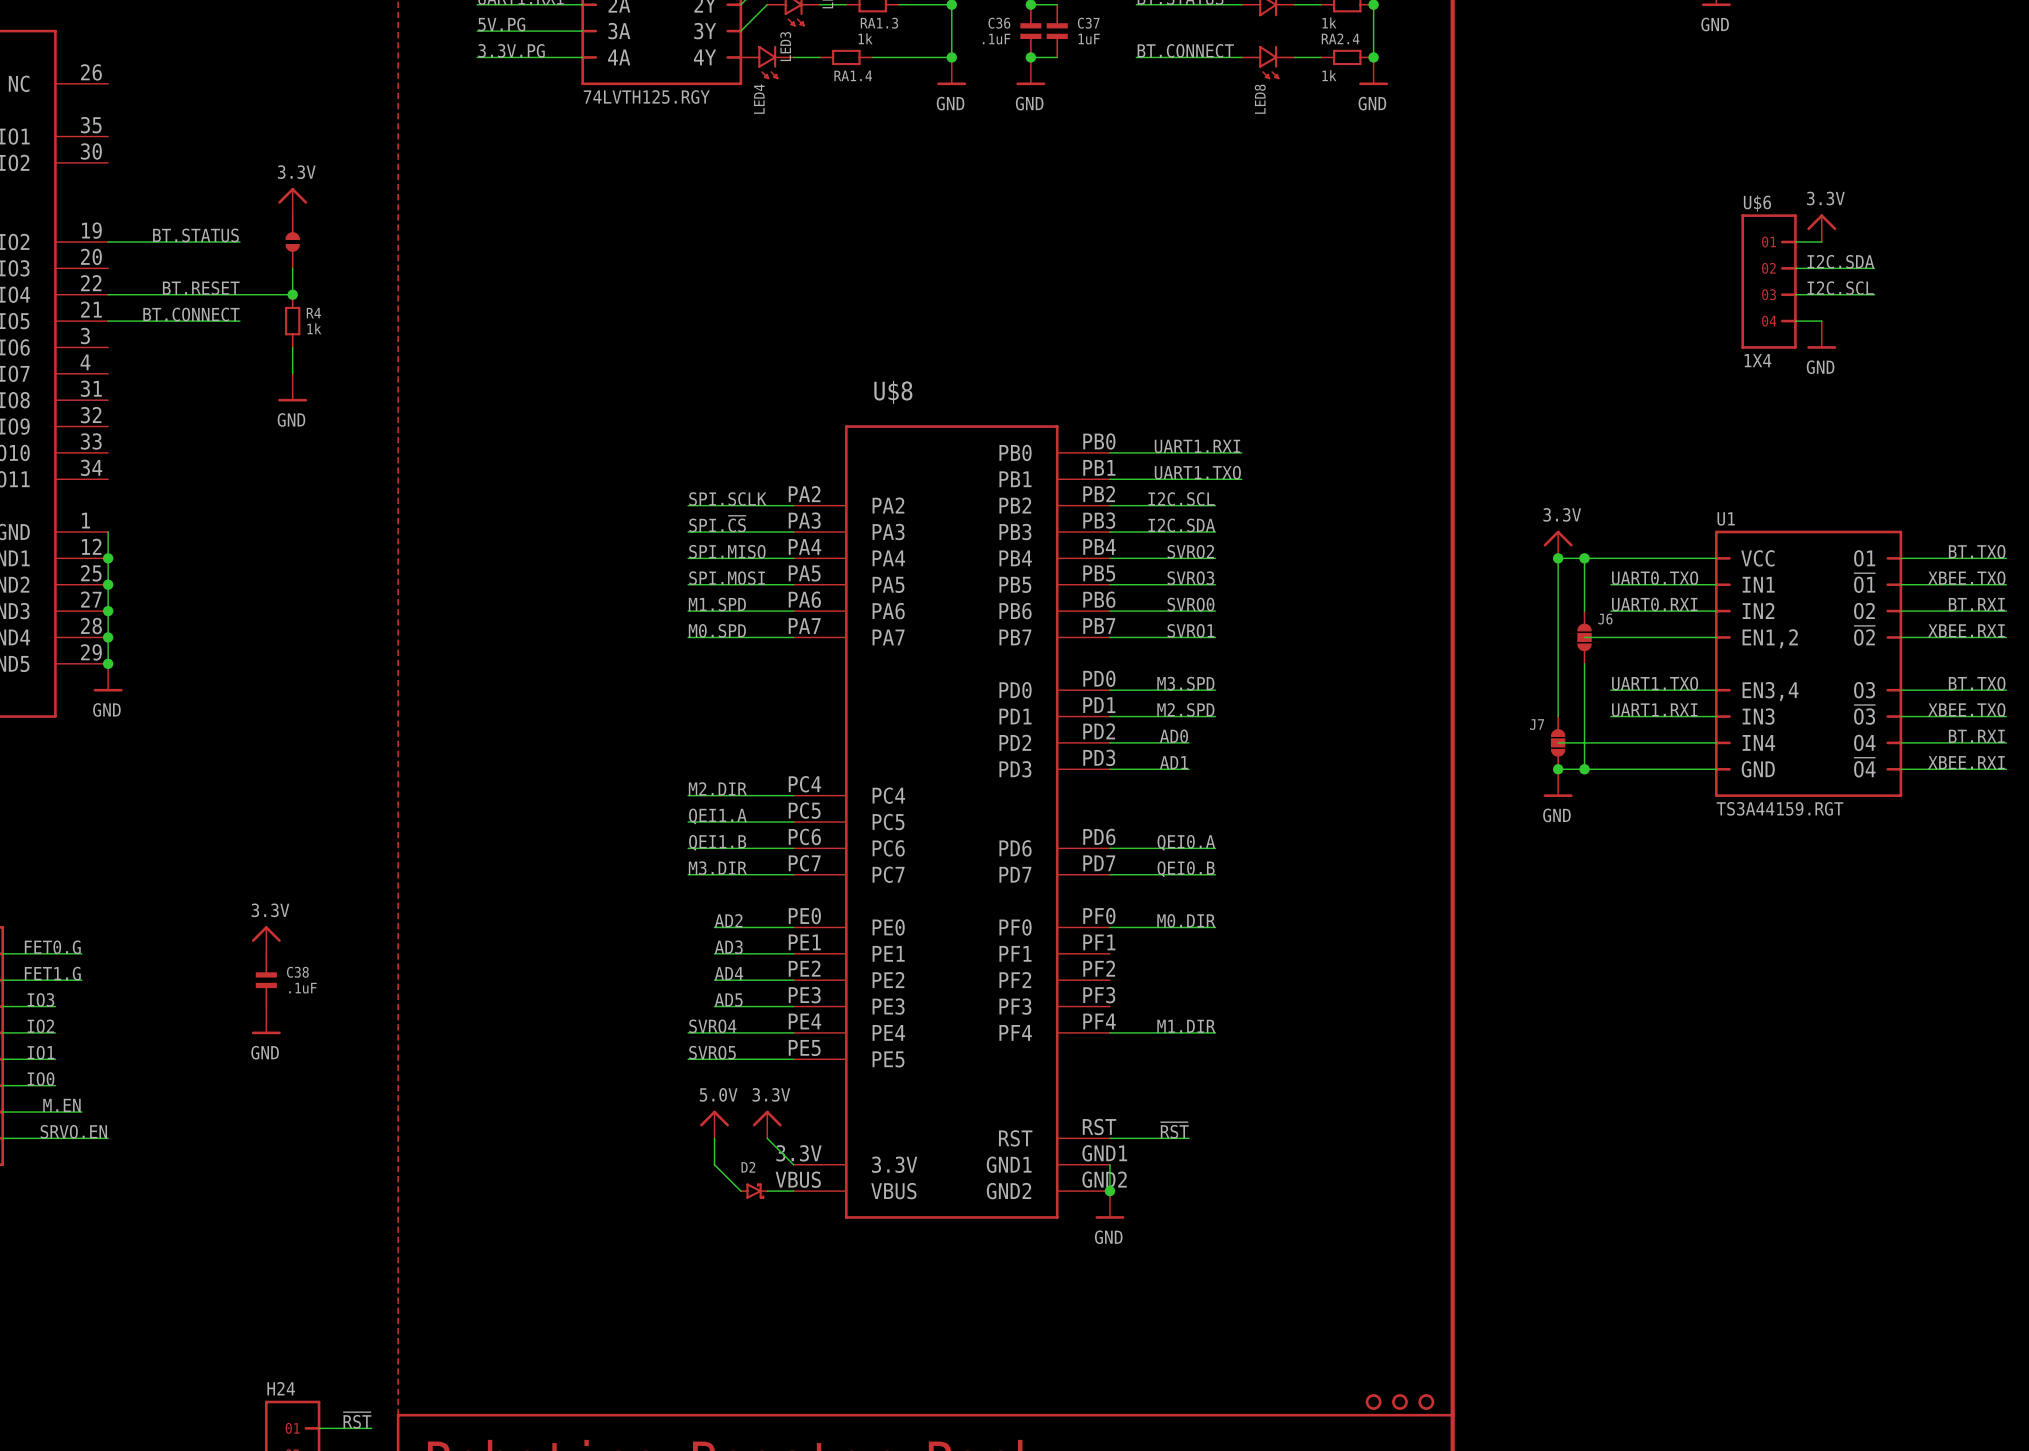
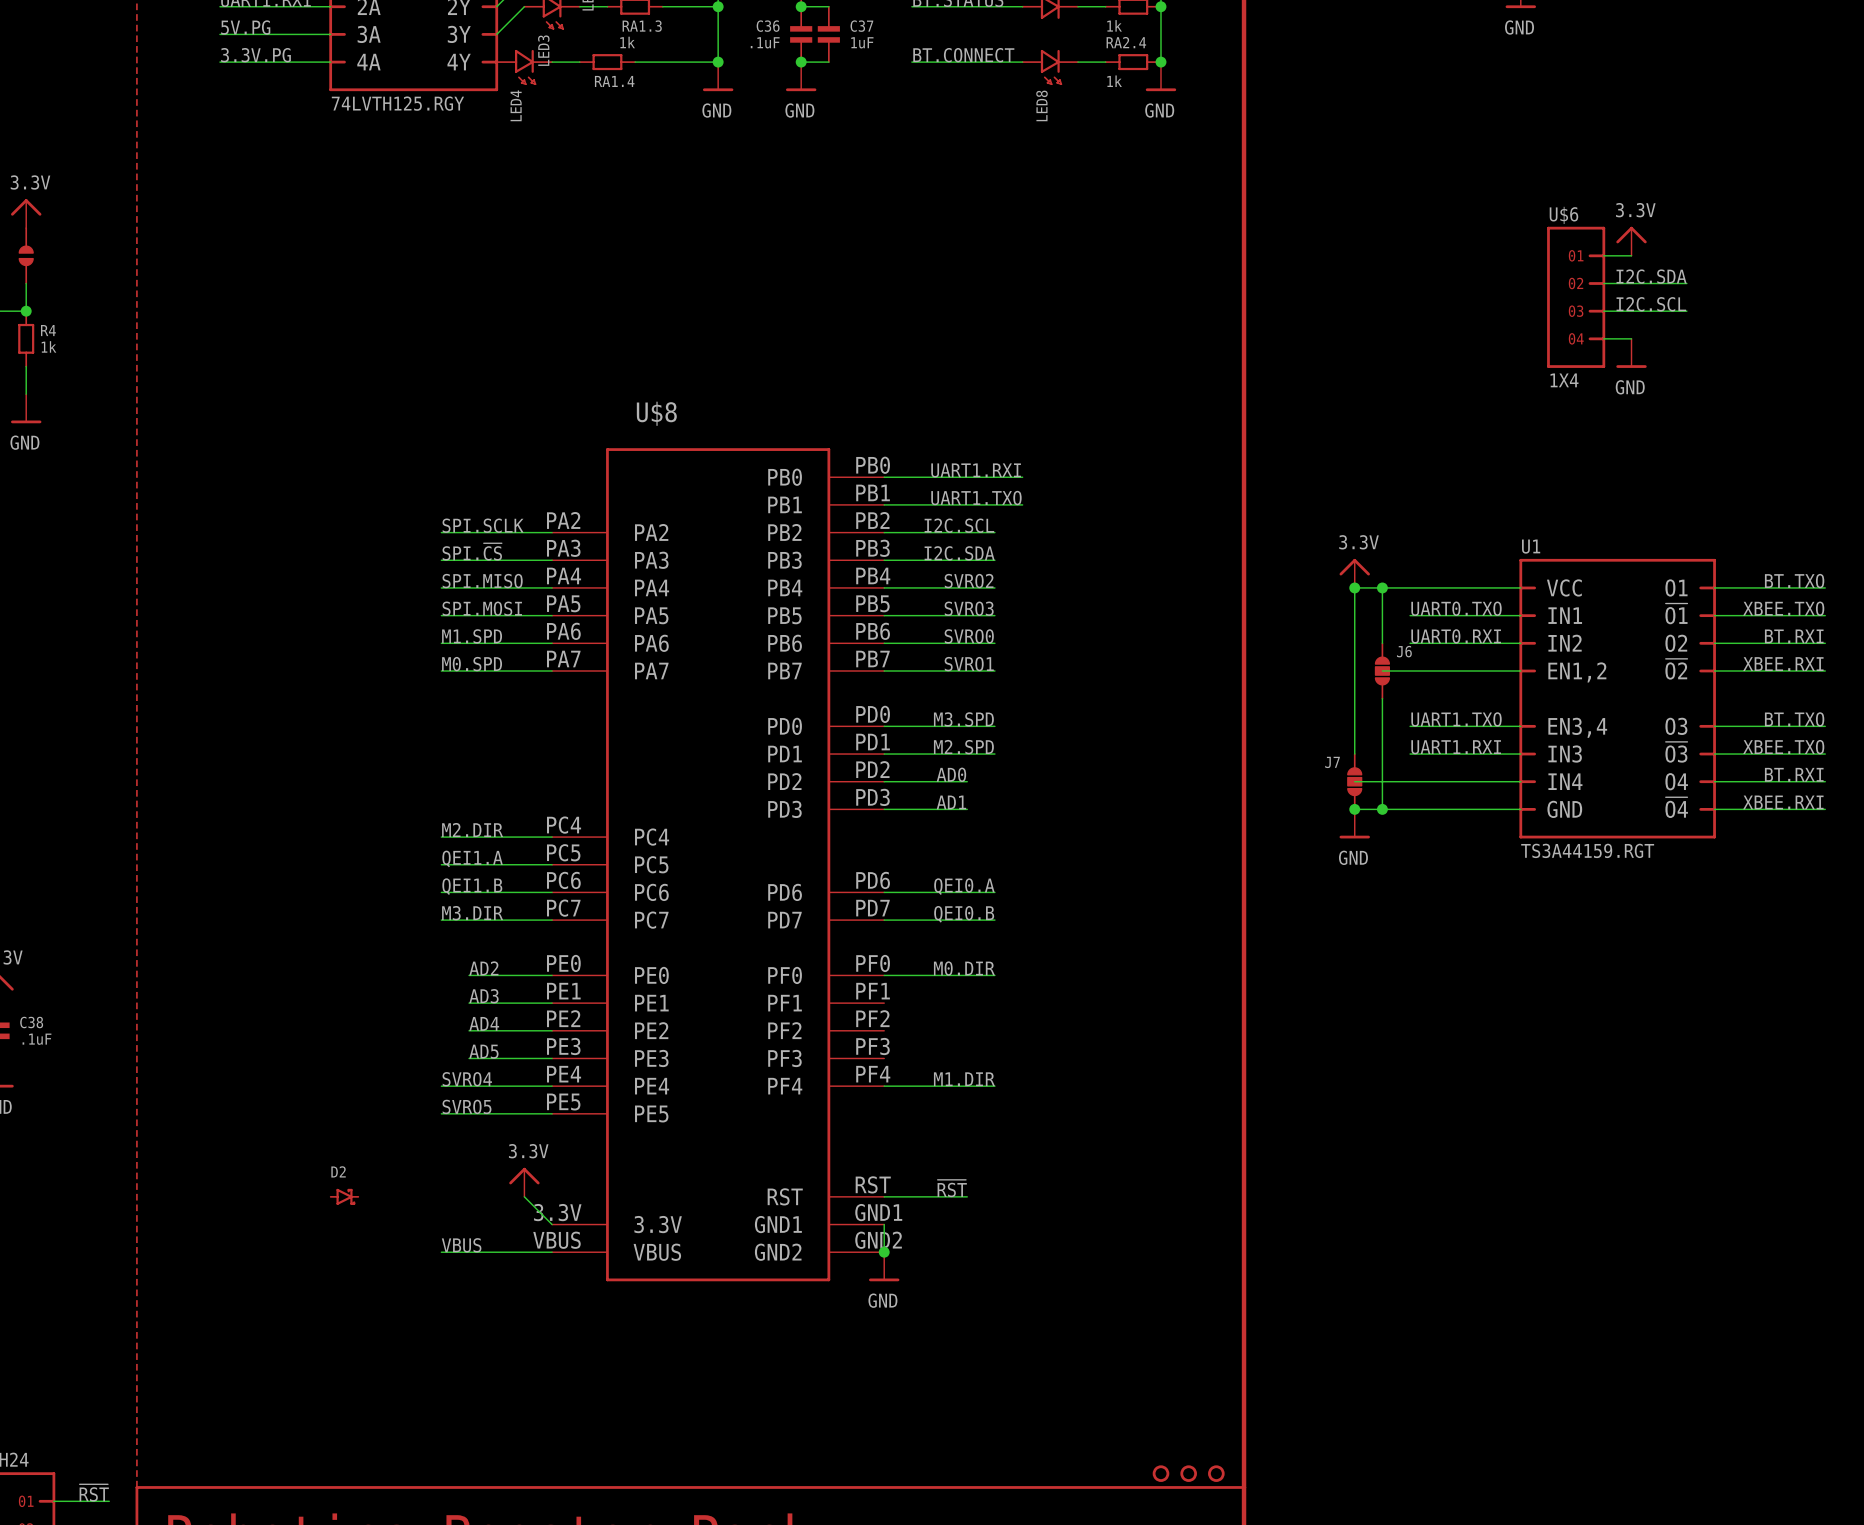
power symbol: 5.0V (714, 1124) -> none
wire: (714, 1138) (714, 1164) (740, 1191) -> none
label: none -> VBUS (461, 1245)
wire: none -> (441, 1252) (524, 1252)
D2 position: (754, 1191) -> (344, 1196)

